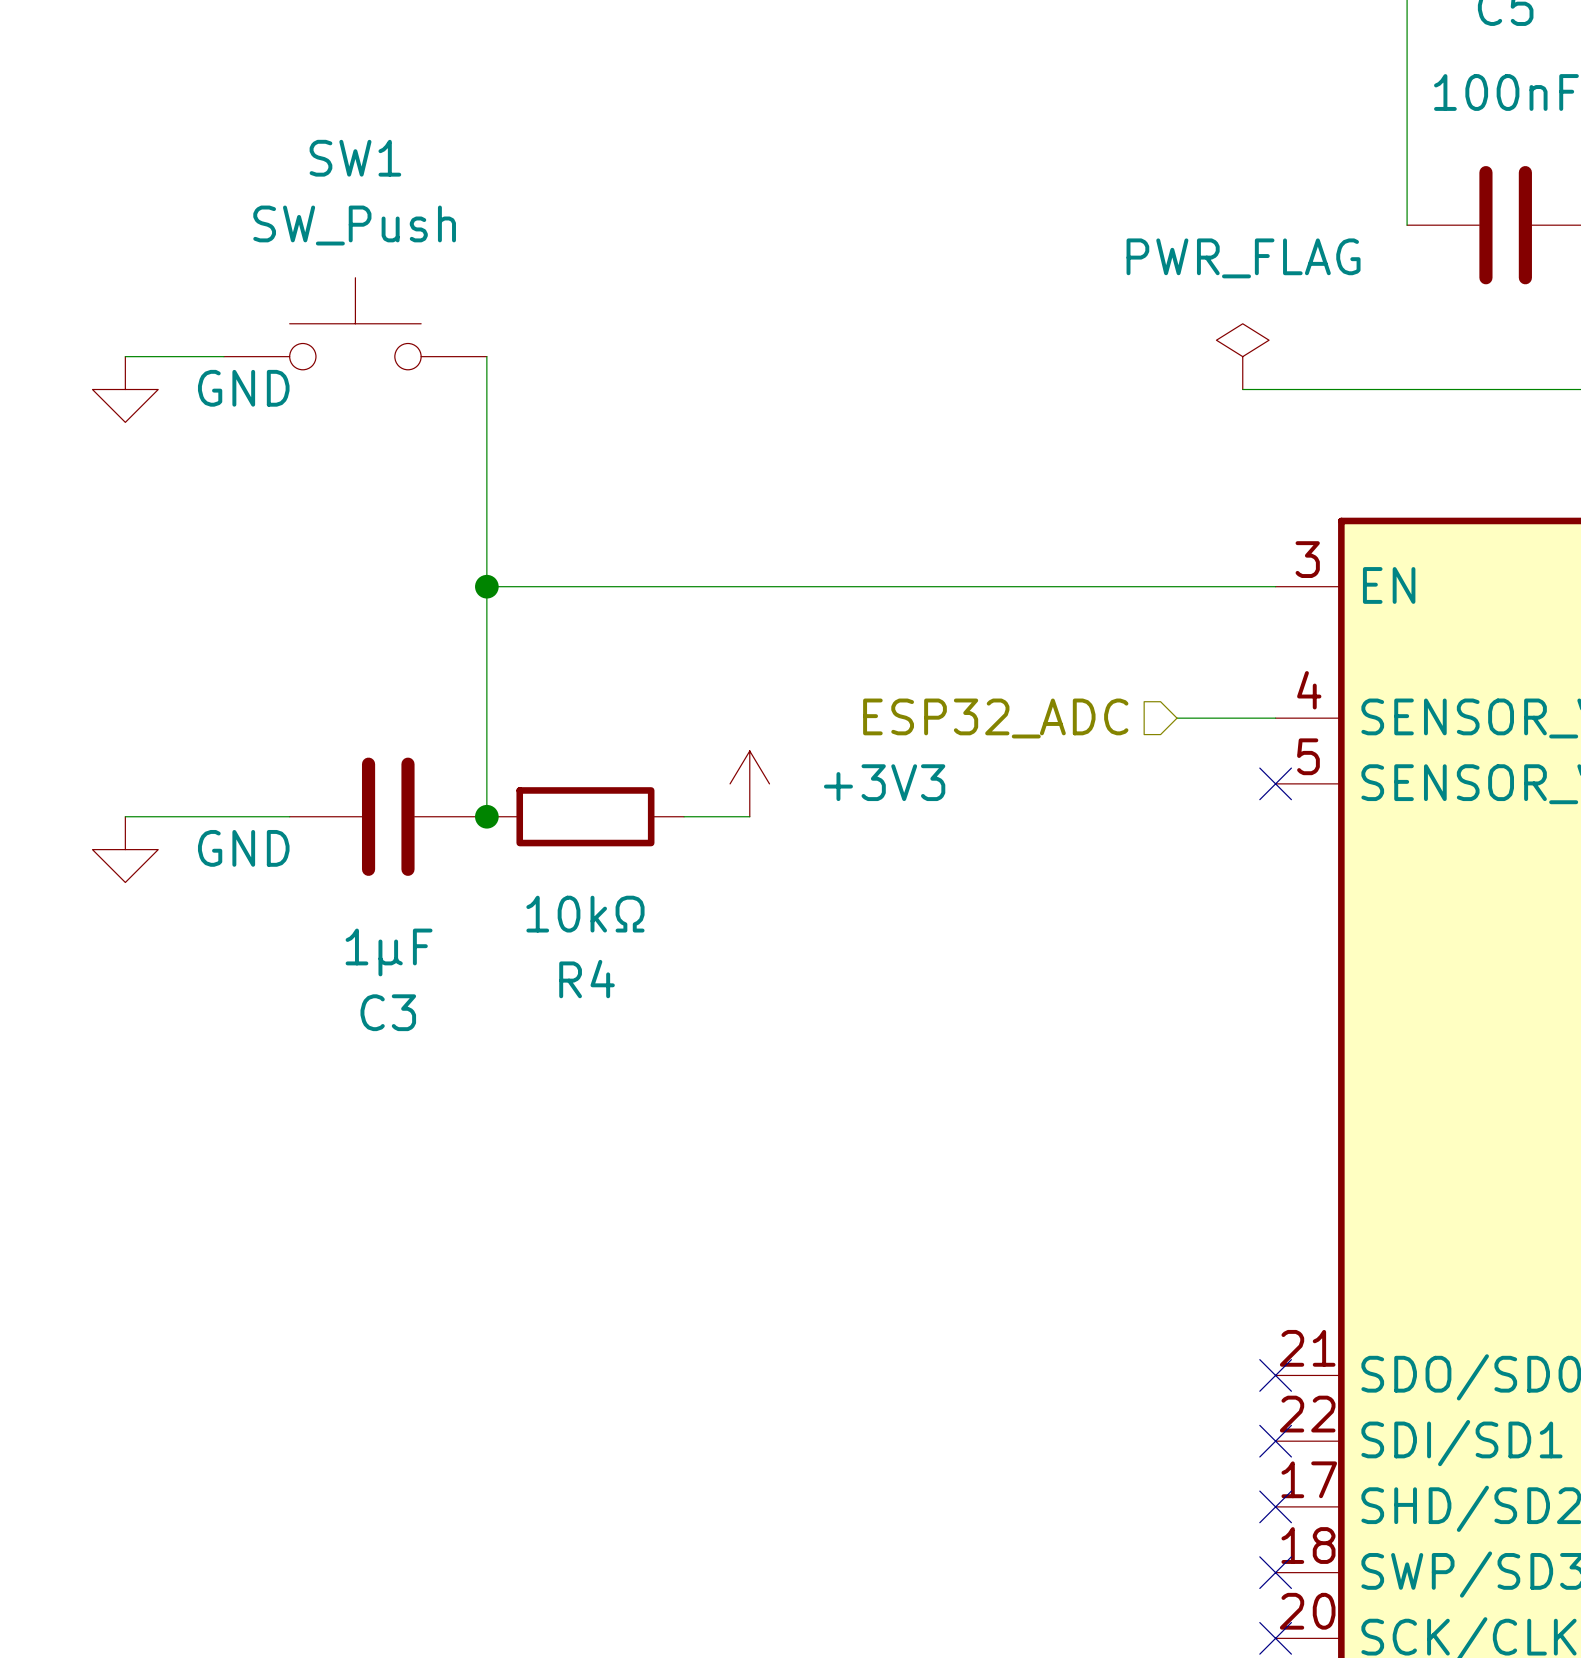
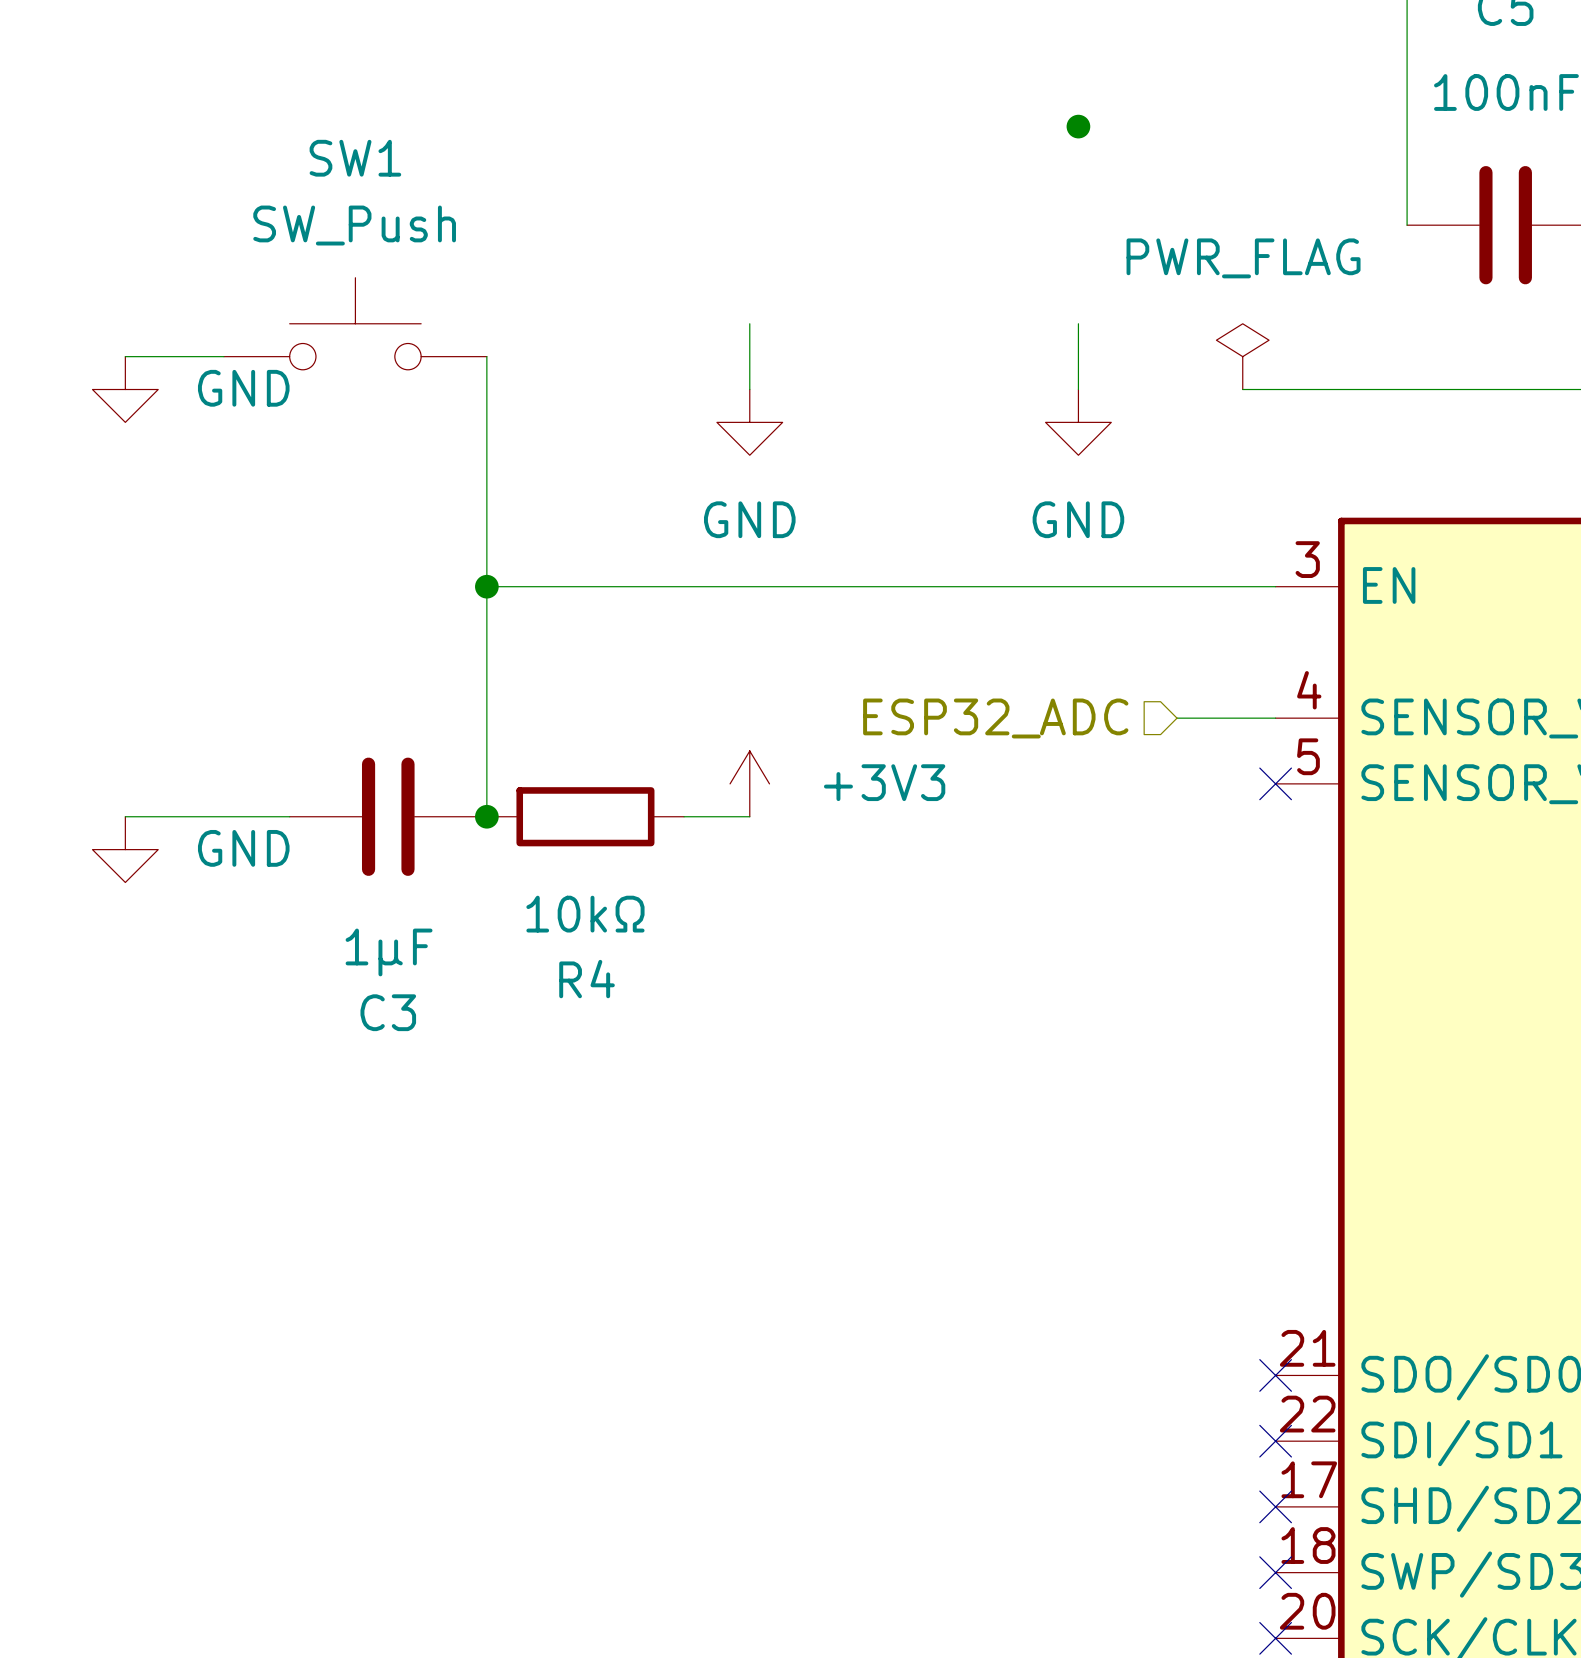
junction: none -> (1078, 126)
wire: none -> (749, 323) (749, 389)
wire: none -> (1078, 323) (1078, 389)
power symbol: none -> GND (749, 422)
power symbol: none -> GND (1078, 422)

